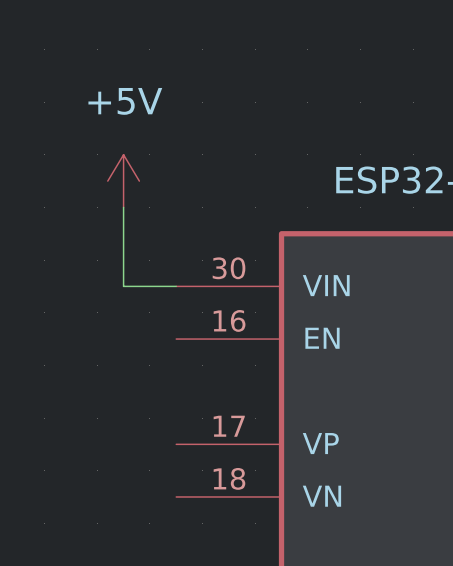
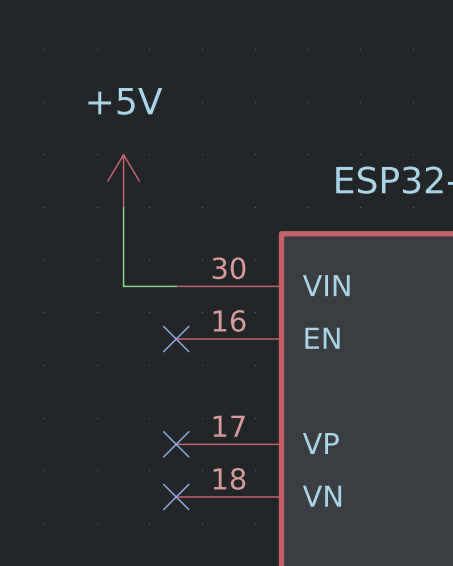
no-connect mark: none -> (176, 339)
no-connect mark: none -> (176, 444)
no-connect mark: none -> (176, 496)

